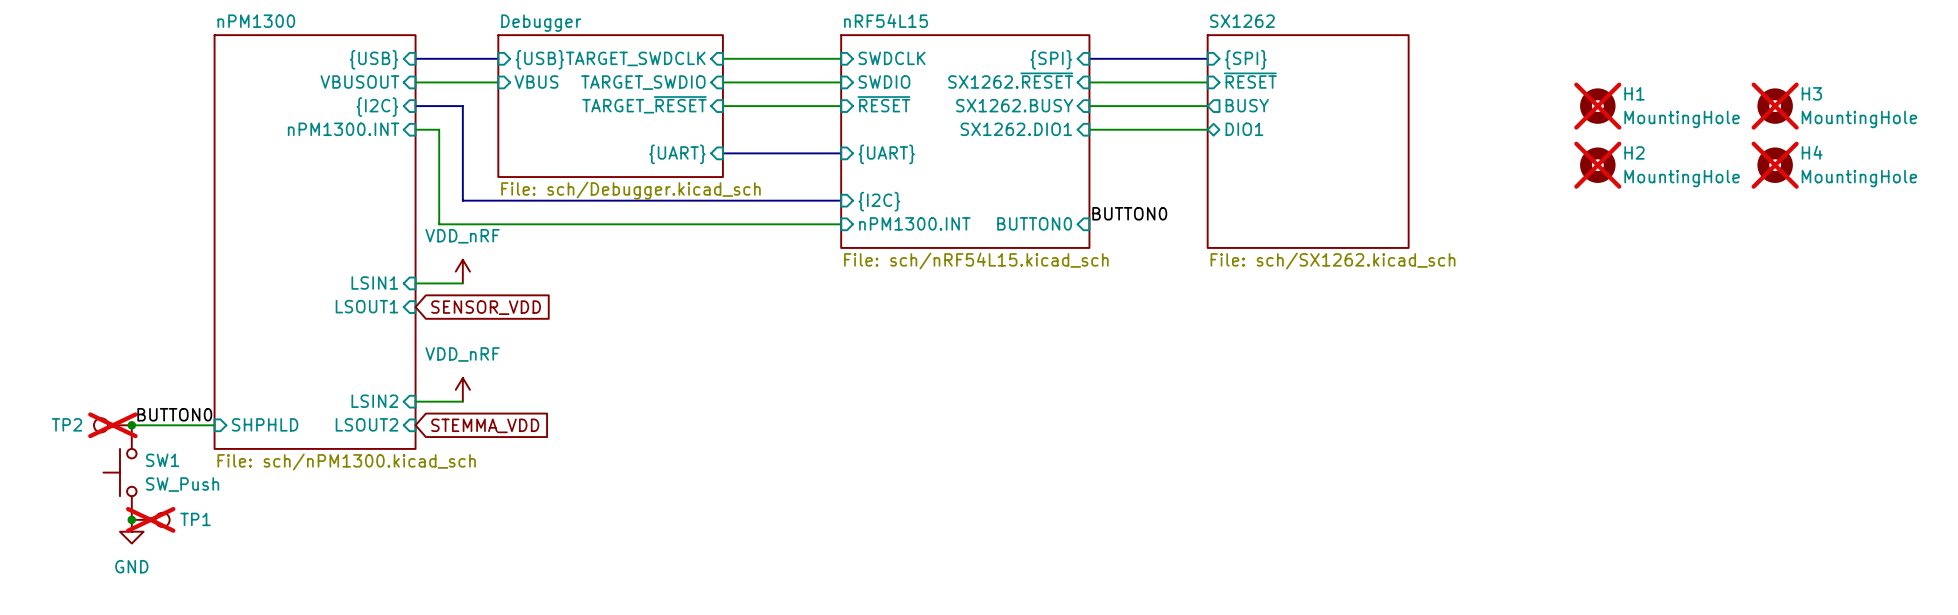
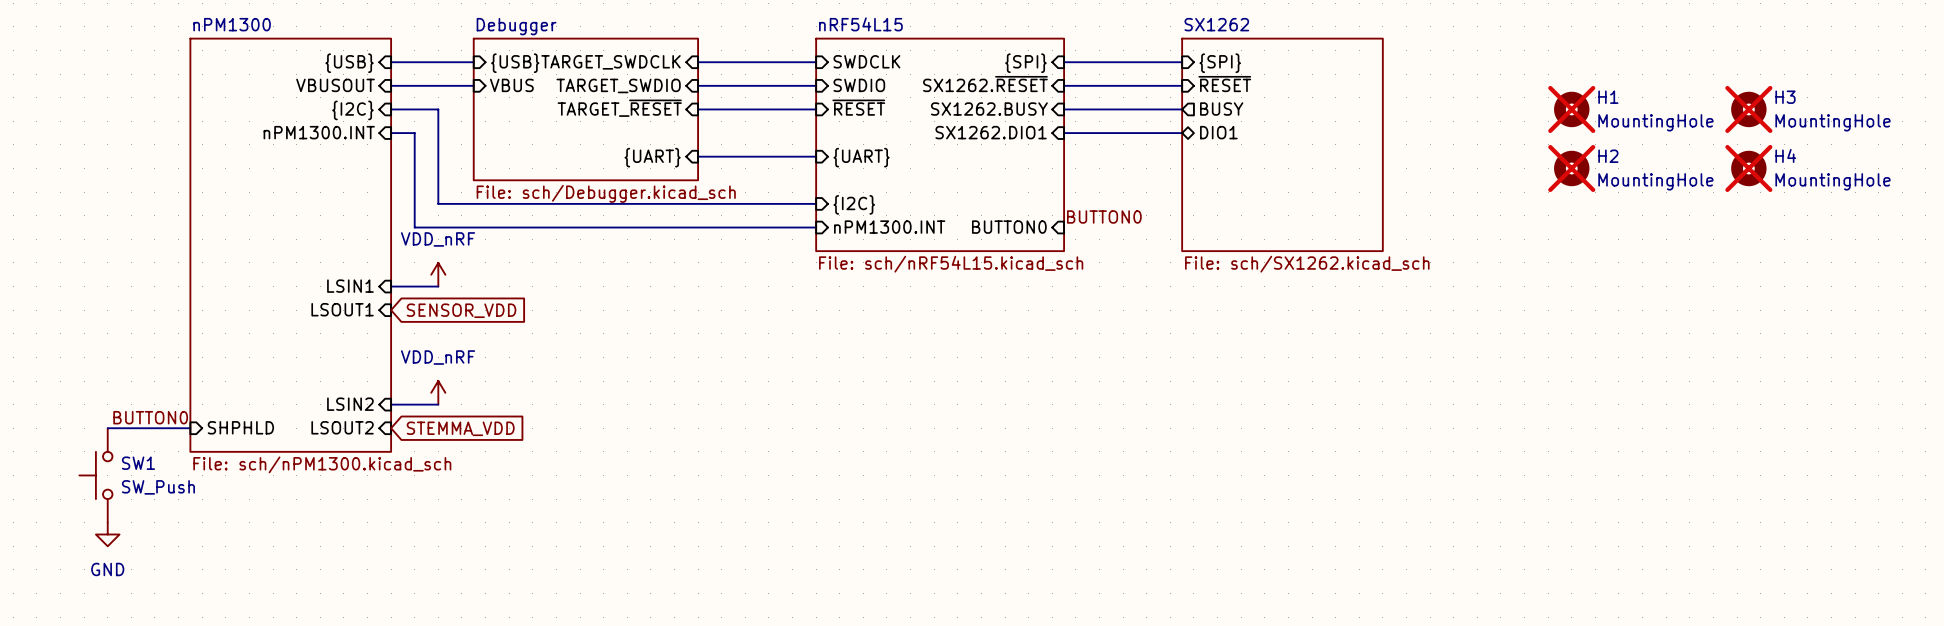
TP2: (112, 425) -> none
junction: (131, 425) -> none
junction: (131, 519) -> none
TP1: (150, 519) -> none

